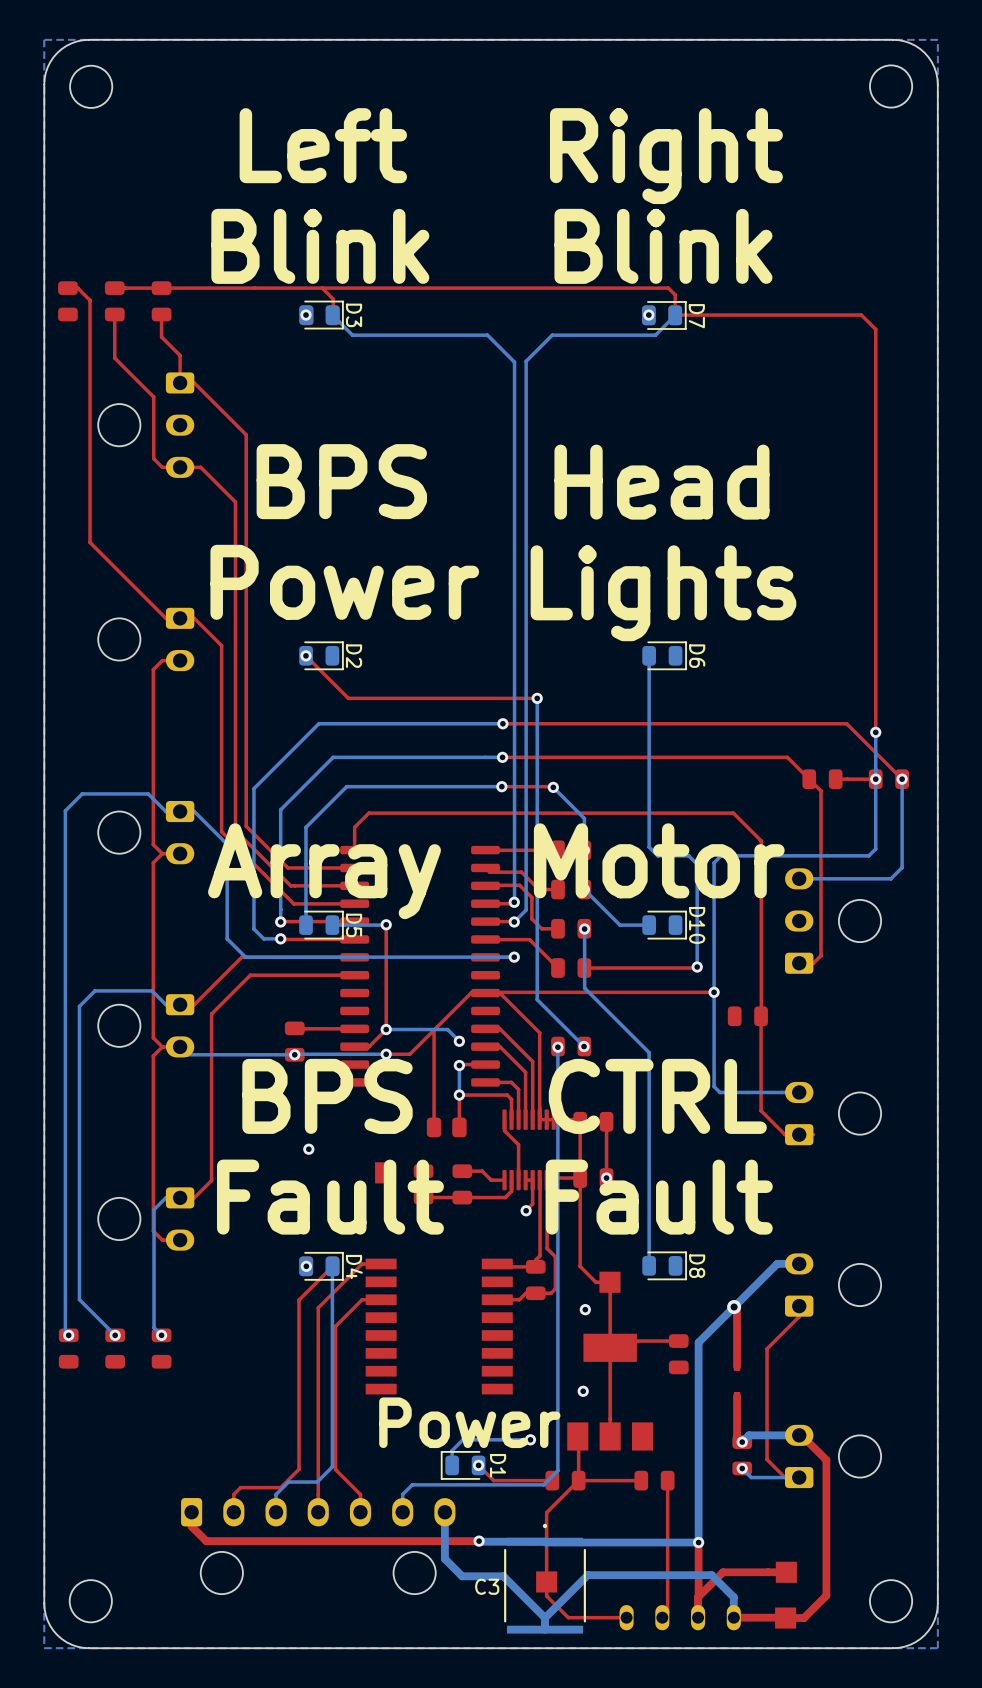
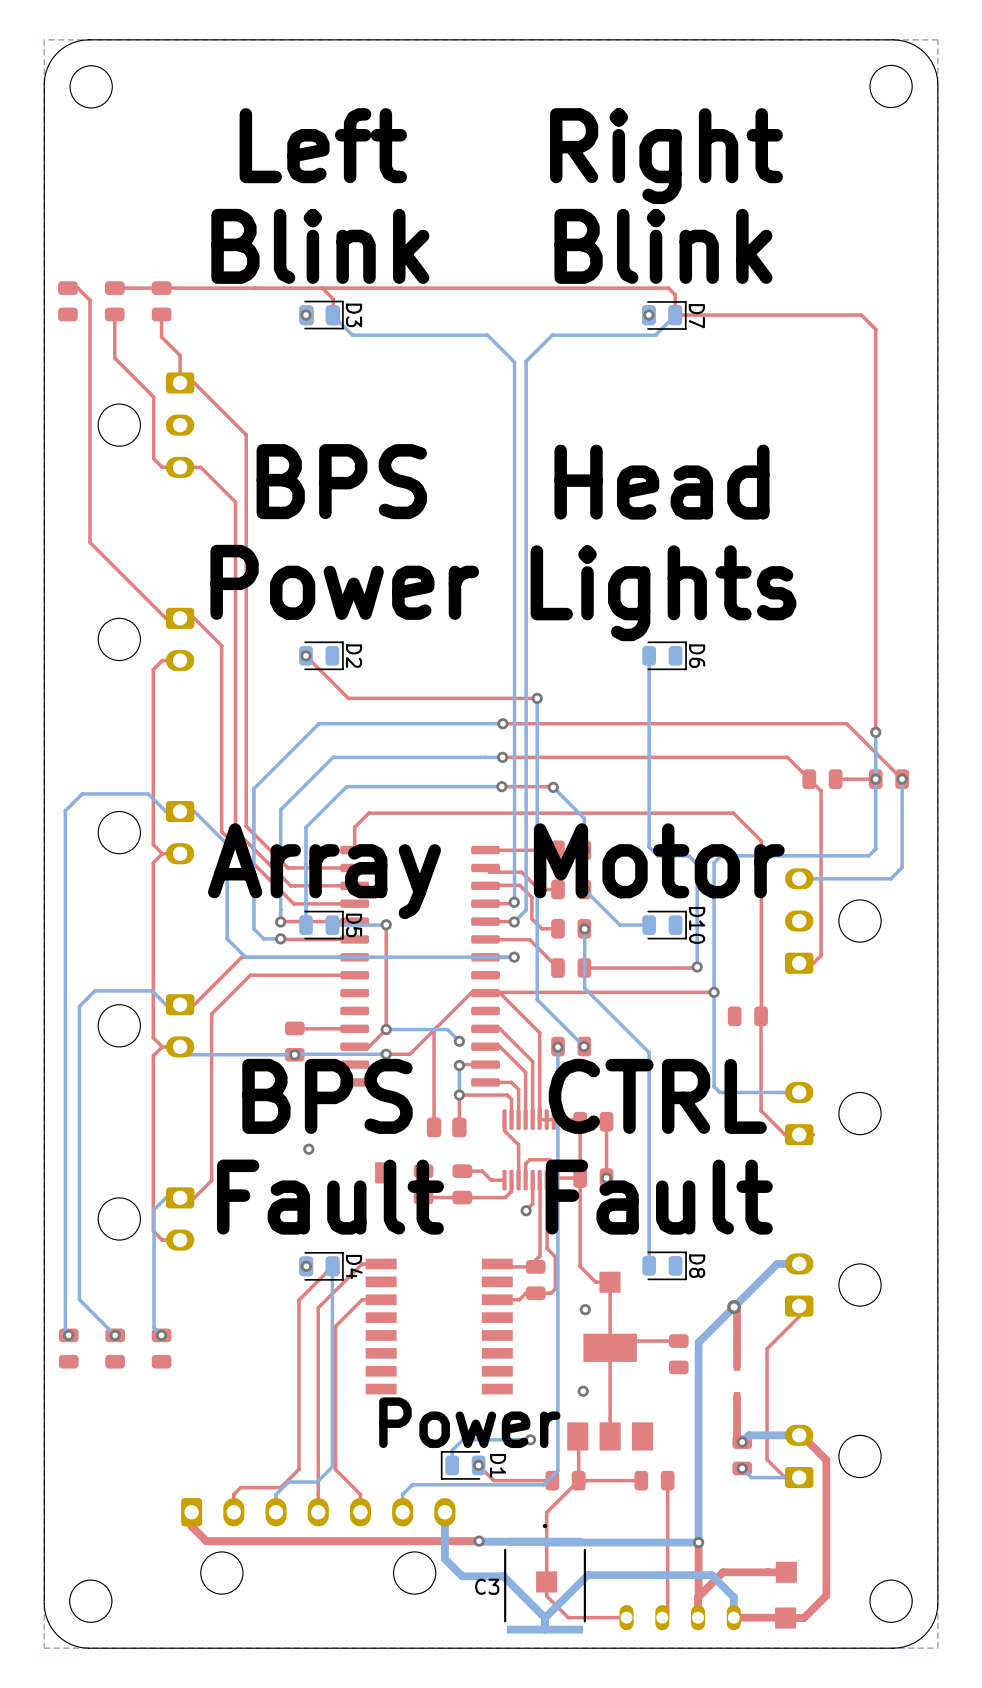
top track: (532, 1180) (525, 1180) -> (553, 1180) (553, 1164) (549, 1159) (529, 1159) (525, 1163) (525, 1180)

